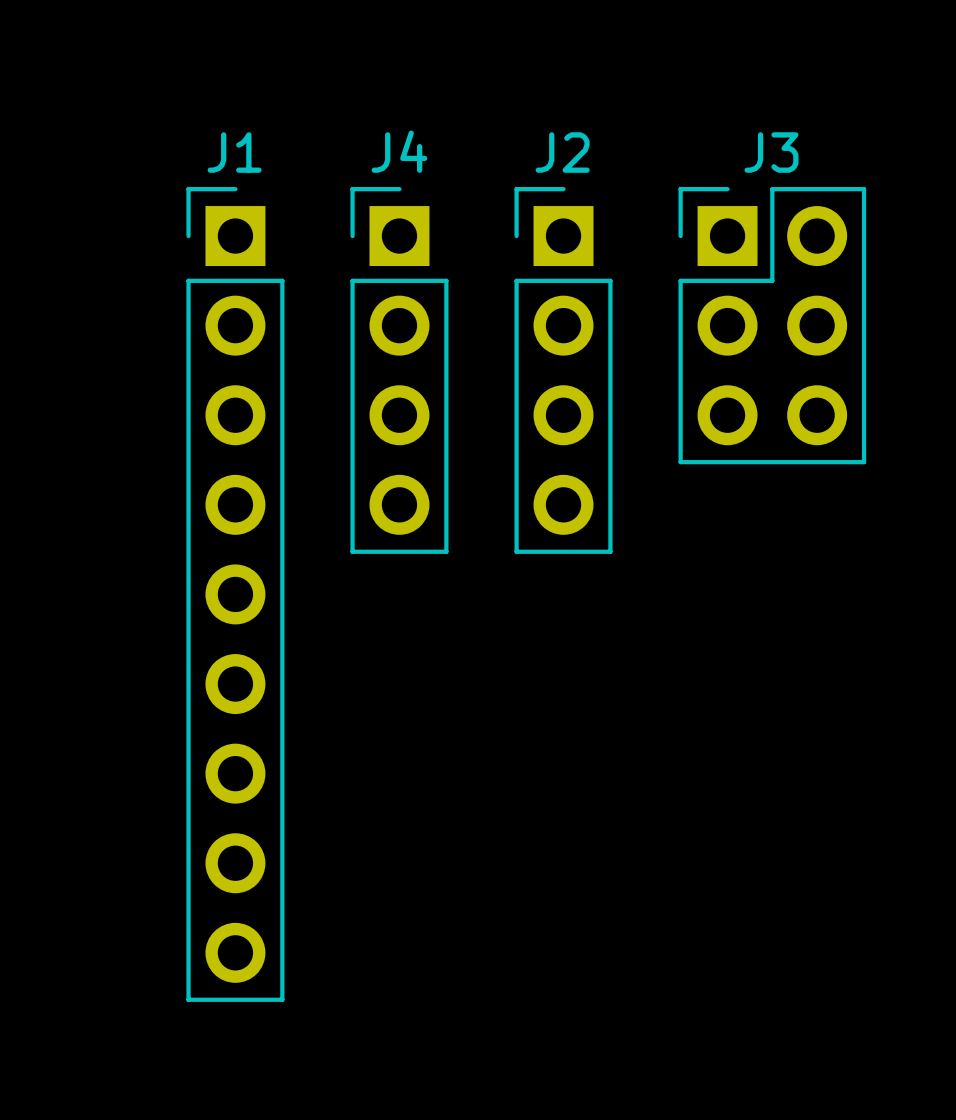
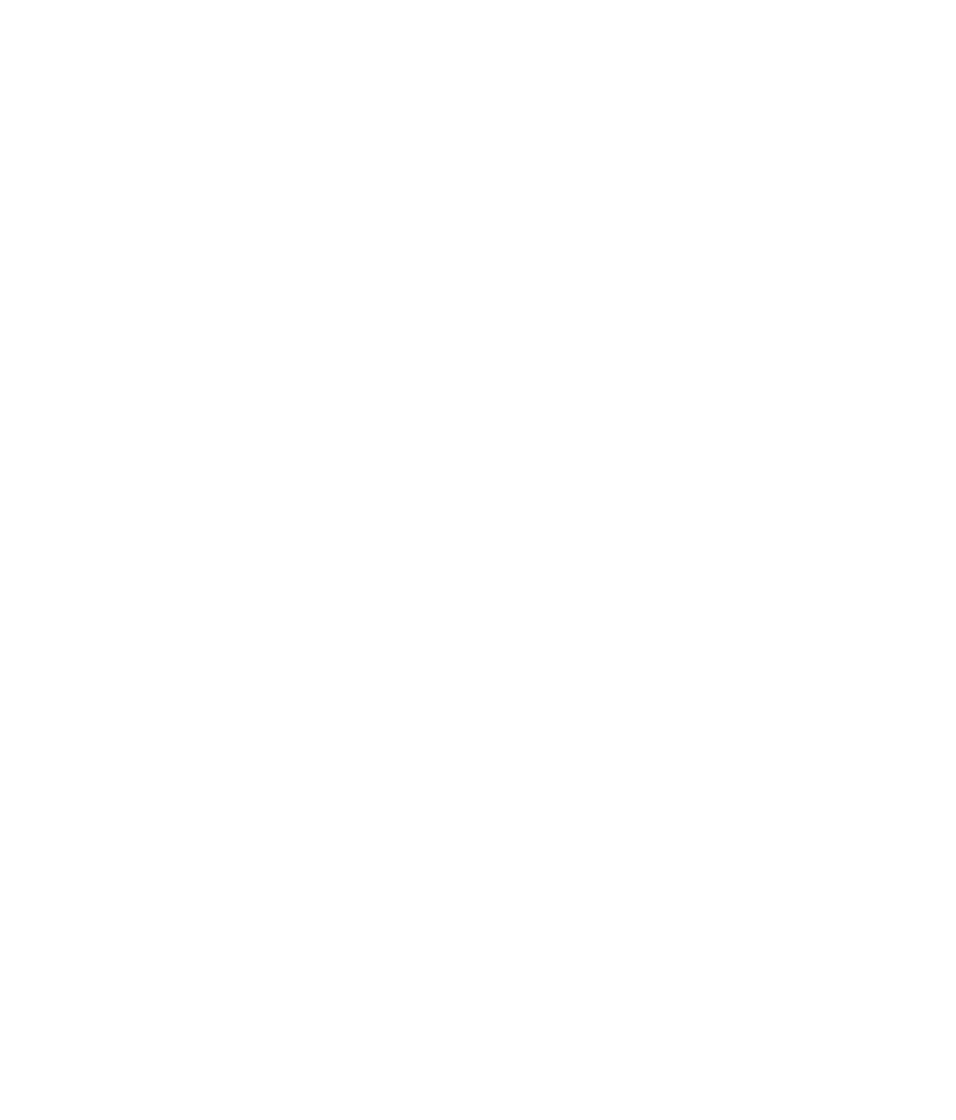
J3: (772, 325) -> none
J4: (399, 370) -> none
J2: (563, 370) -> none
J1: (235, 594) -> none

